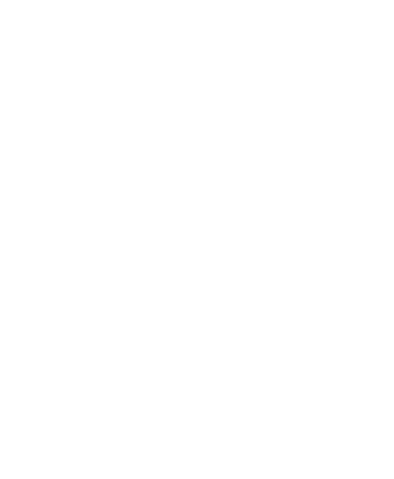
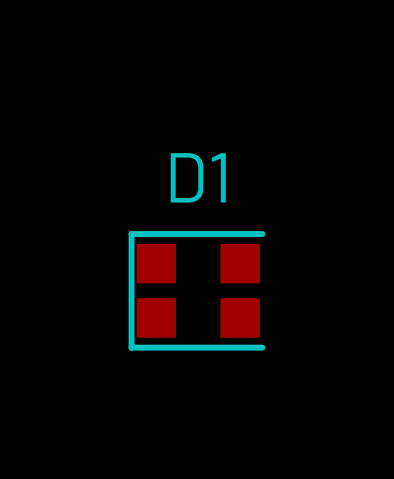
D1: none -> (196, 290)

